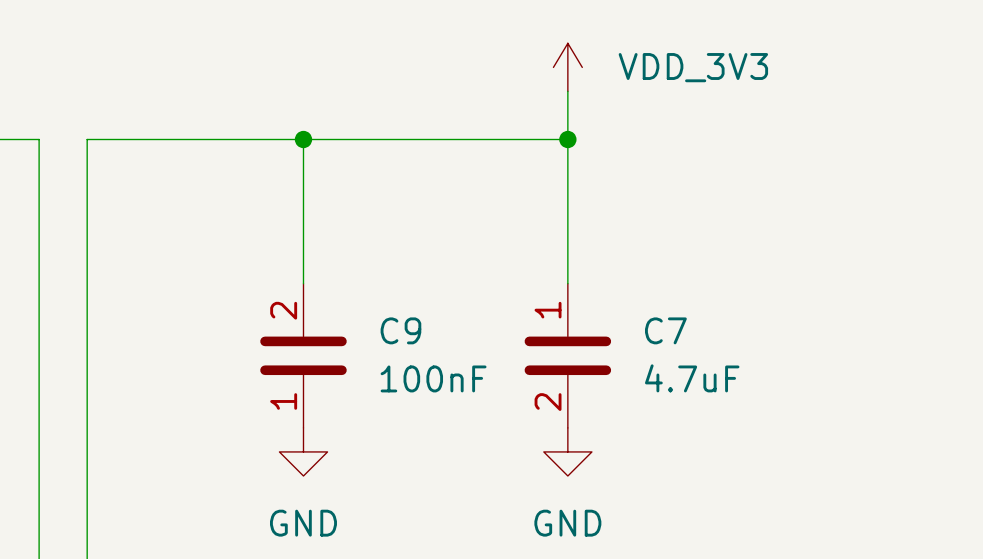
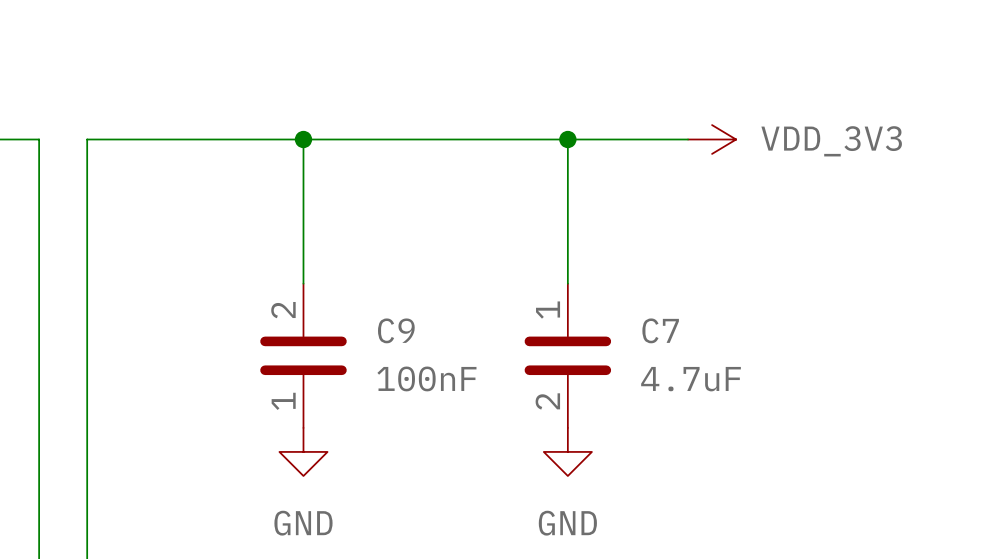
power symbol rotation: 0° (567, 67) -> 90° clockwise (712, 139)
power symbol position: VDD_3V3 (567, 67) -> VDD_3V3 (712, 139)
wire: (567, 91) (567, 139) -> (688, 139) (567, 139)

